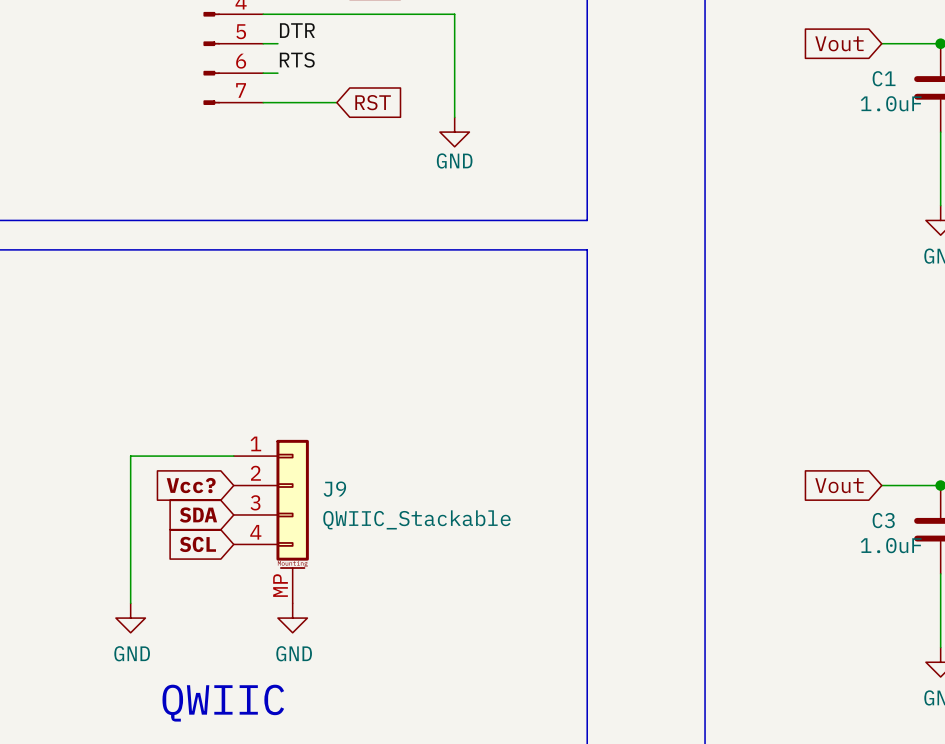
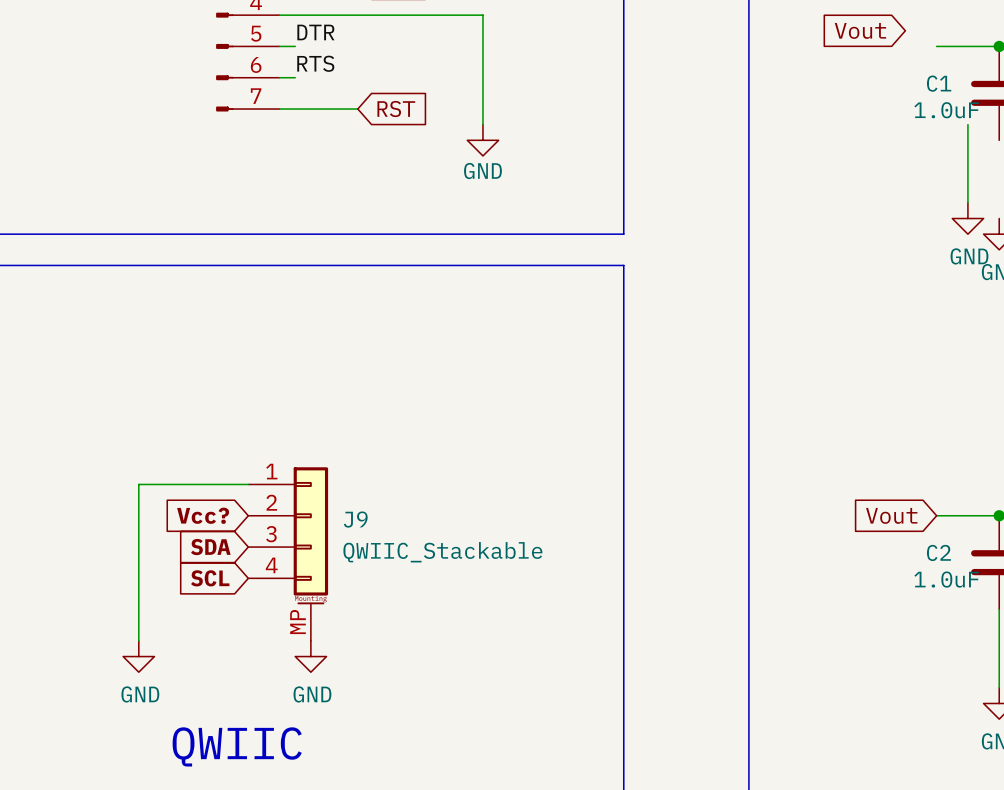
global label position: Vout (839, 43) -> Vout (860, 30)
wire: (940, 132) (940, 205) -> (967, 124) (967, 202)
power symbol: none -> GND (967, 218)
C3 name: C3 (883, 520) -> C2 (938, 552)

